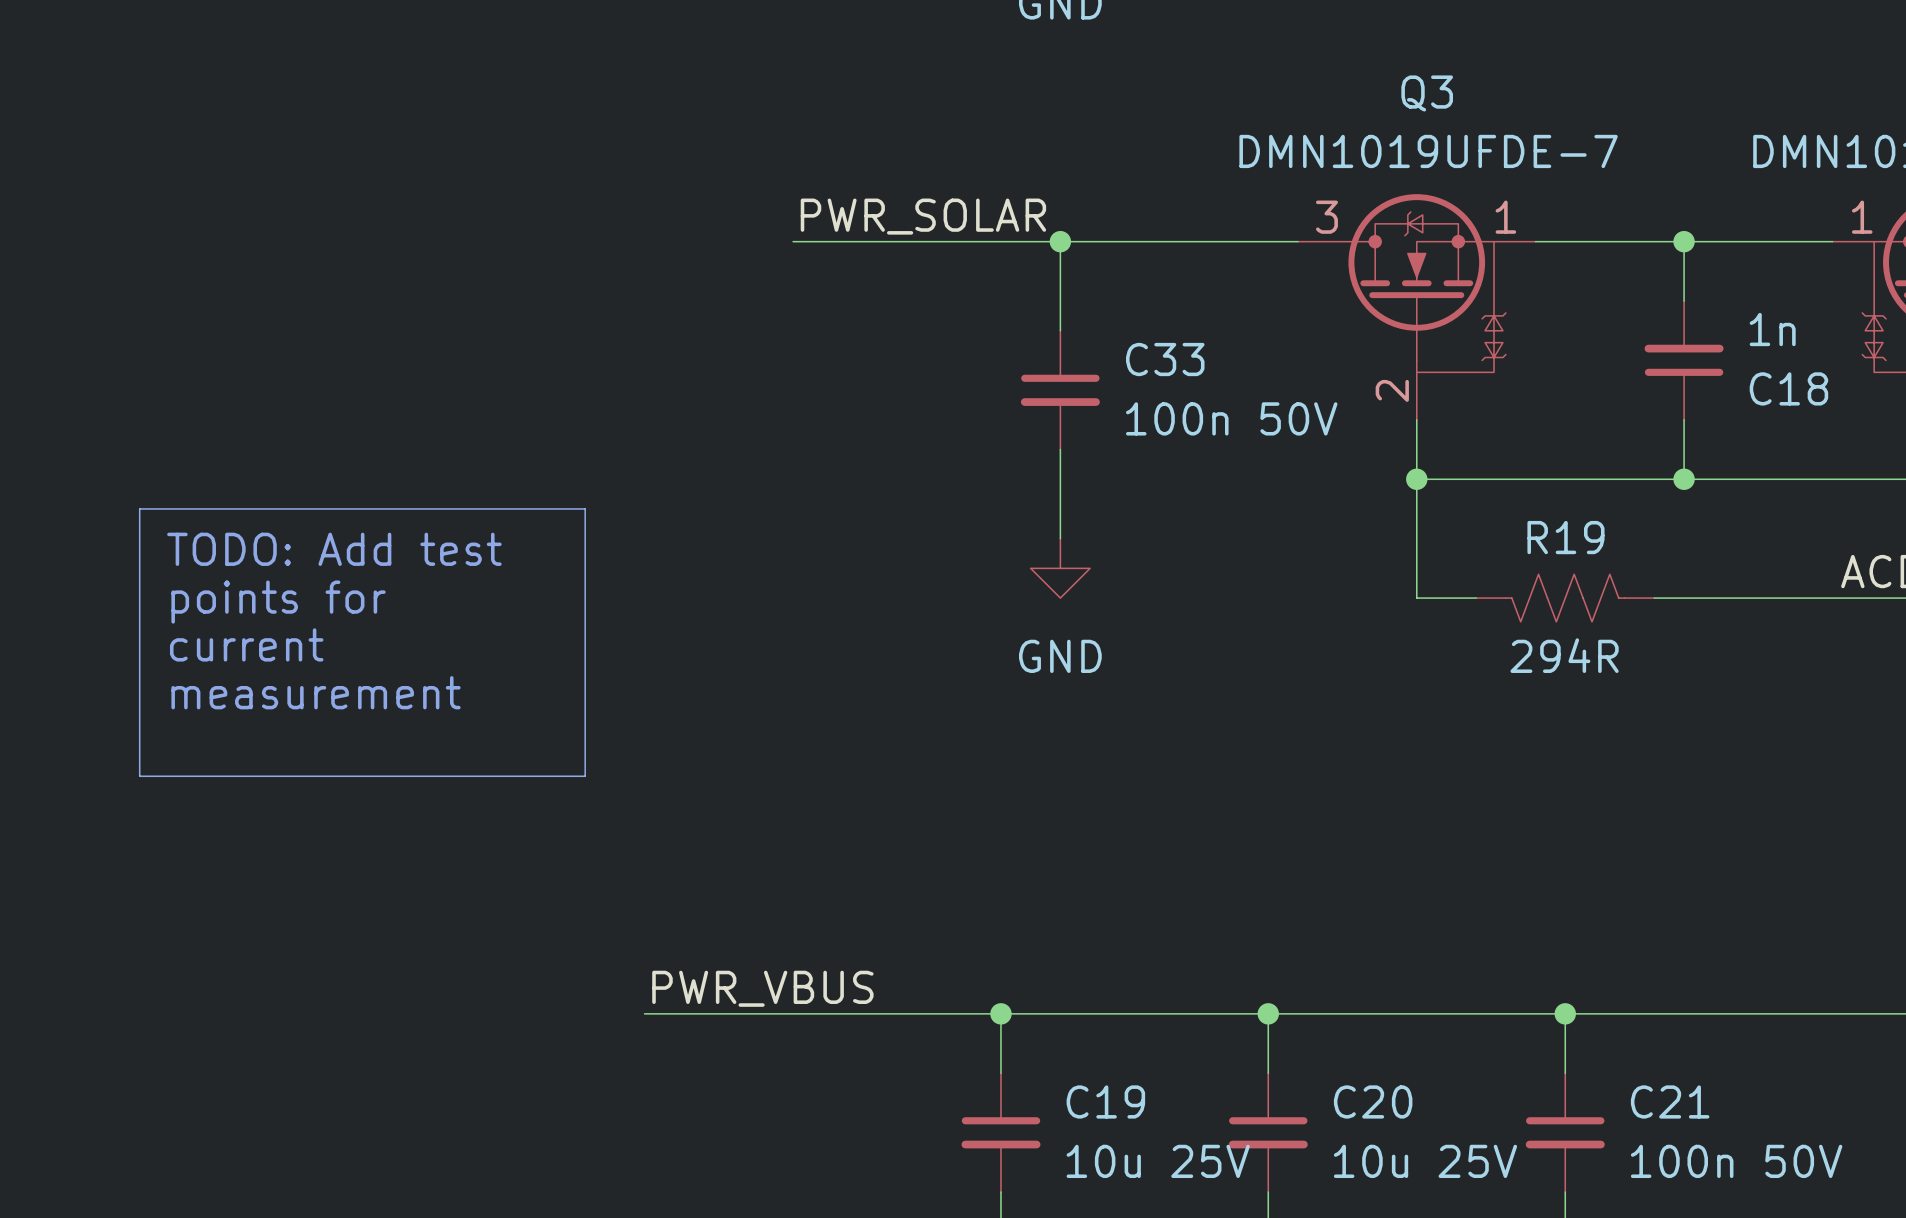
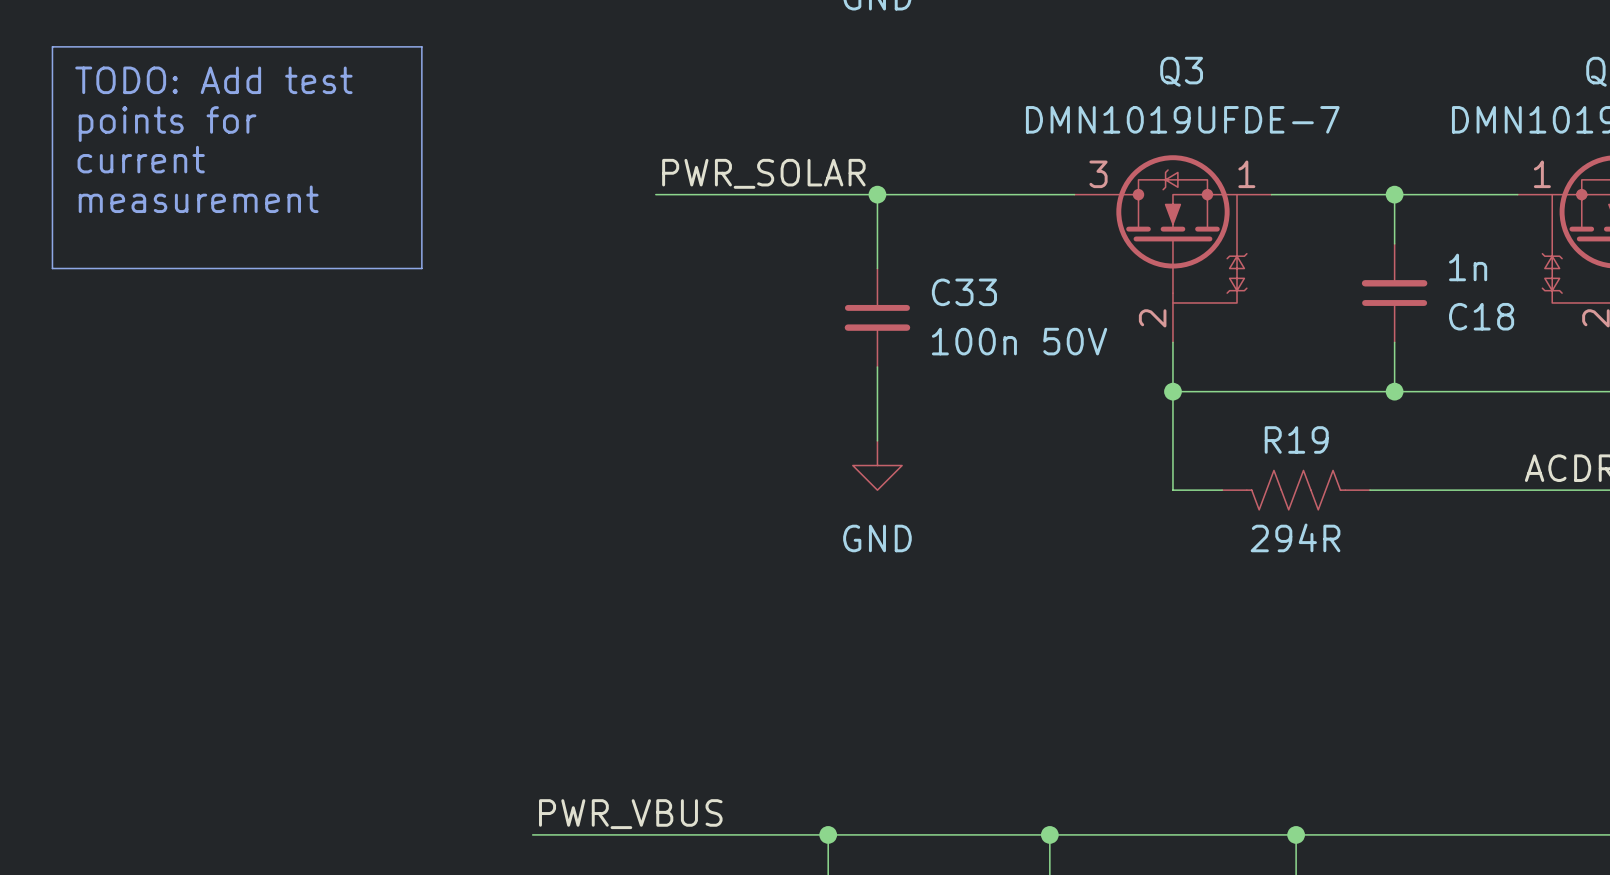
line: (139, 508) (585, 508) (585, 776) (139, 776) (139, 508) -> (52, 46) (421, 46) (421, 268) (52, 268) (52, 46)
text position: TODO: Add test (334, 549) -> TODO: Add test (213, 80)
text position: points for (278, 602) -> points for (167, 124)
text position: current (246, 644) -> current (141, 159)
text position: measurement (316, 692) -> measurement (198, 199)

